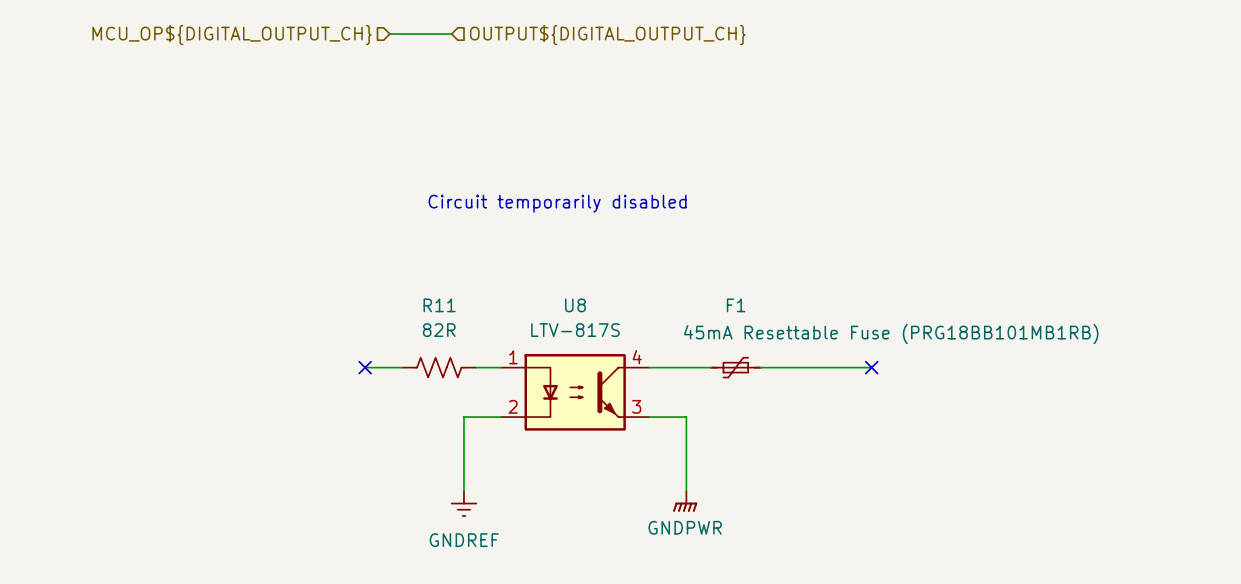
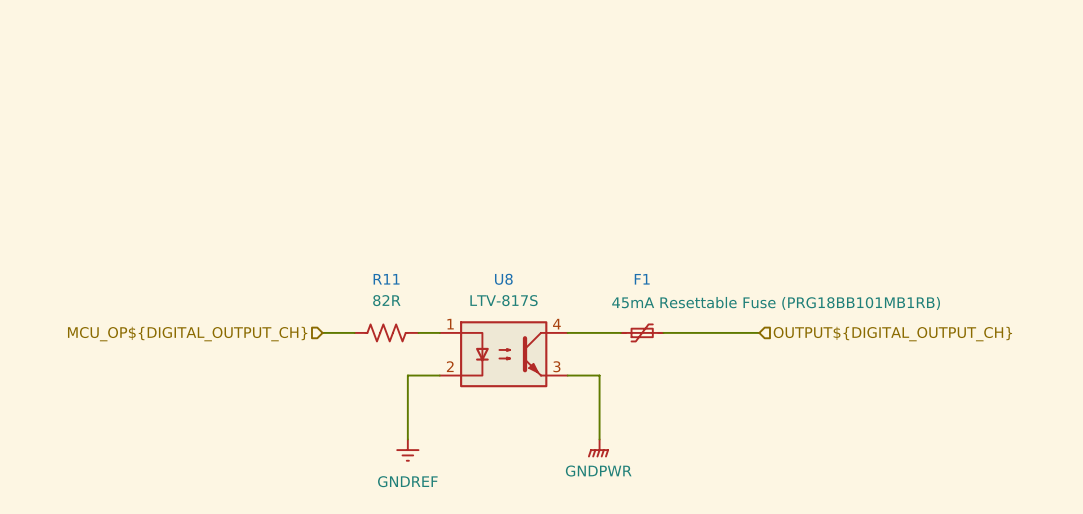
wire: (389, 34) (451, 34) -> none
hierarchical label: MCU_OP${DIGITAL_OUTPUT_CH} (231, 35) -> none
hierarchical label: OUTPUT${DIGITAL_OUTPUT_CH} (607, 35) -> none
text: Circuit temporarily disabled (557, 203) -> none
no-connect mark: (365, 367) -> none
no-connect mark: (871, 367) -> none
hierarchical label: none -> MCU_OP${DIGITAL_OUTPUT_CH} (187, 334)
hierarchical label: none -> OUTPUT${DIGITAL_OUTPUT_CH} (892, 334)

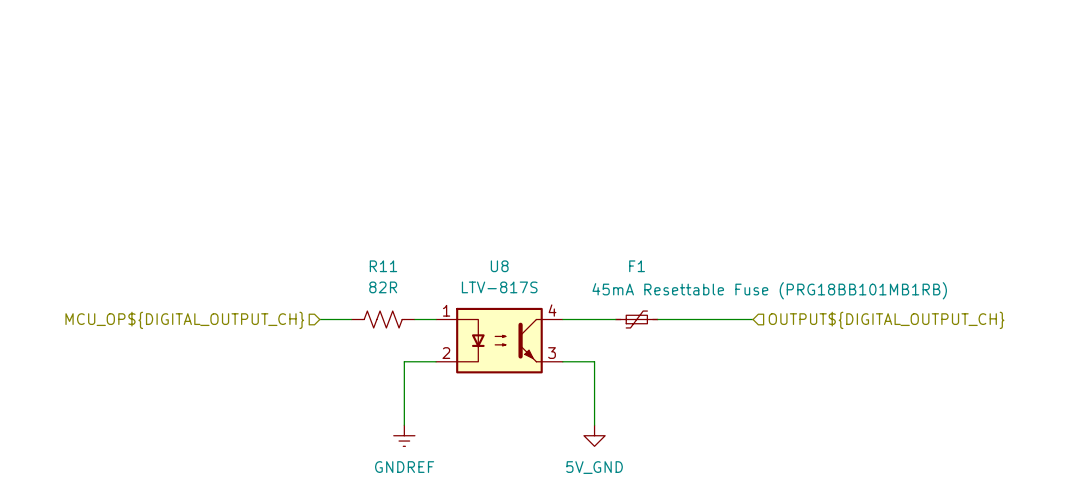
power symbol: GNDPWR (598, 448) -> 5V_GND (594, 435)

